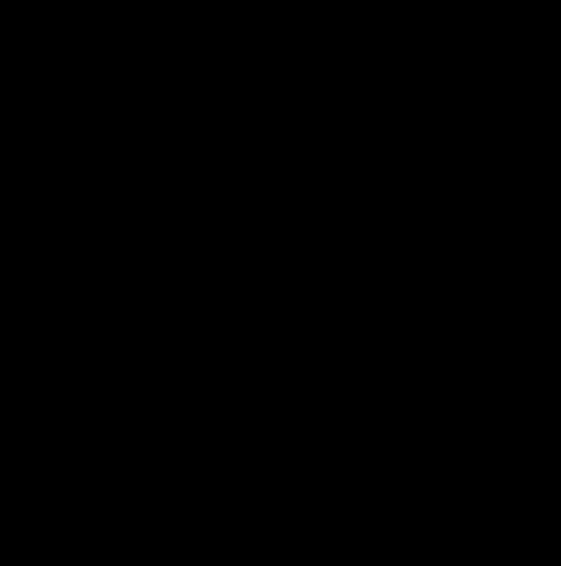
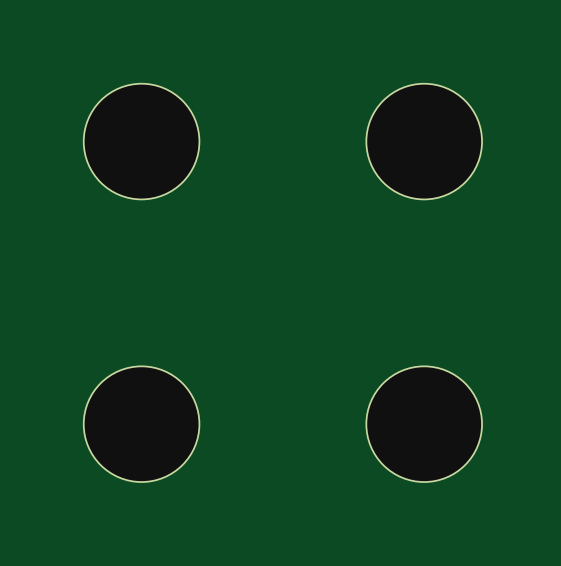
part: none -> (141, 141)
part: none -> (424, 141)
part: none -> (141, 424)
part: none -> (424, 424)

